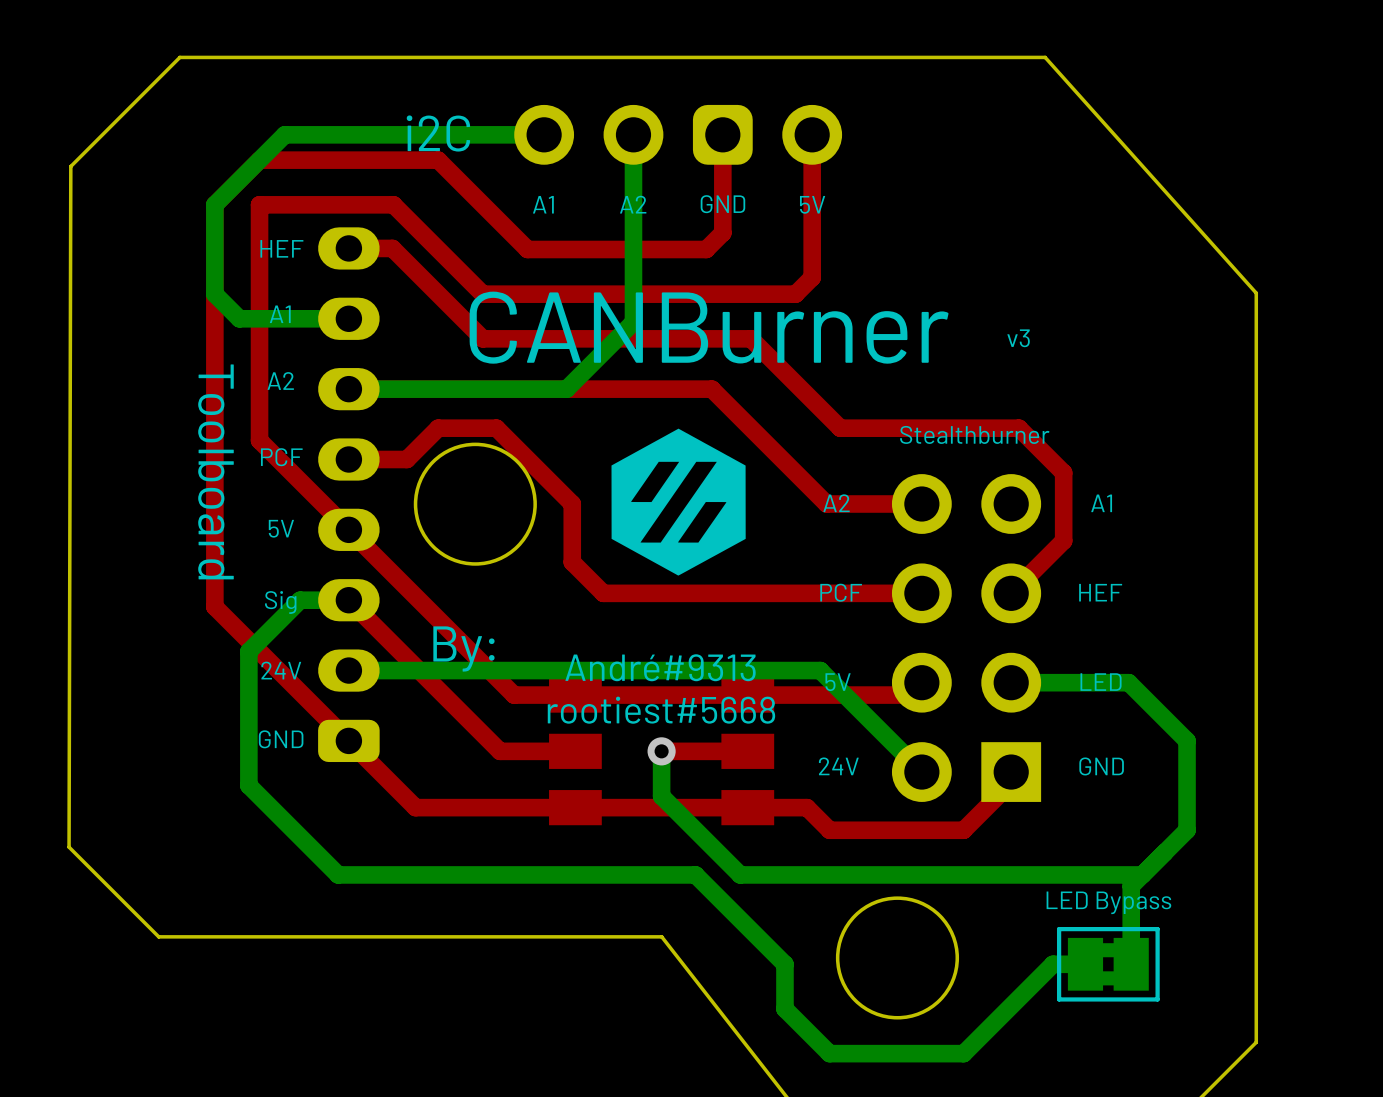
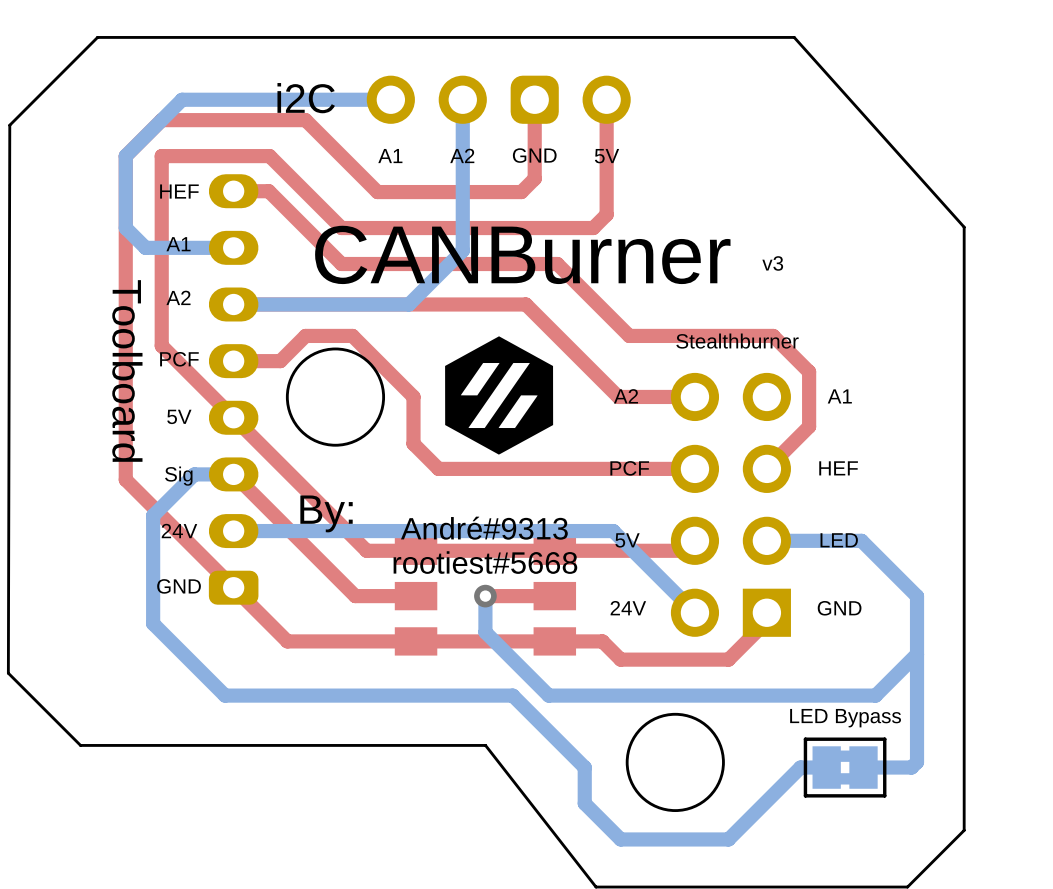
bottom track: (1187, 740) (1187, 830) (1131, 886) (1131, 964) -> (908, 587) (917, 596) (917, 762) (911, 767) (863, 767)
bottom track: none -> (917, 654) (875, 695) (872, 695)

